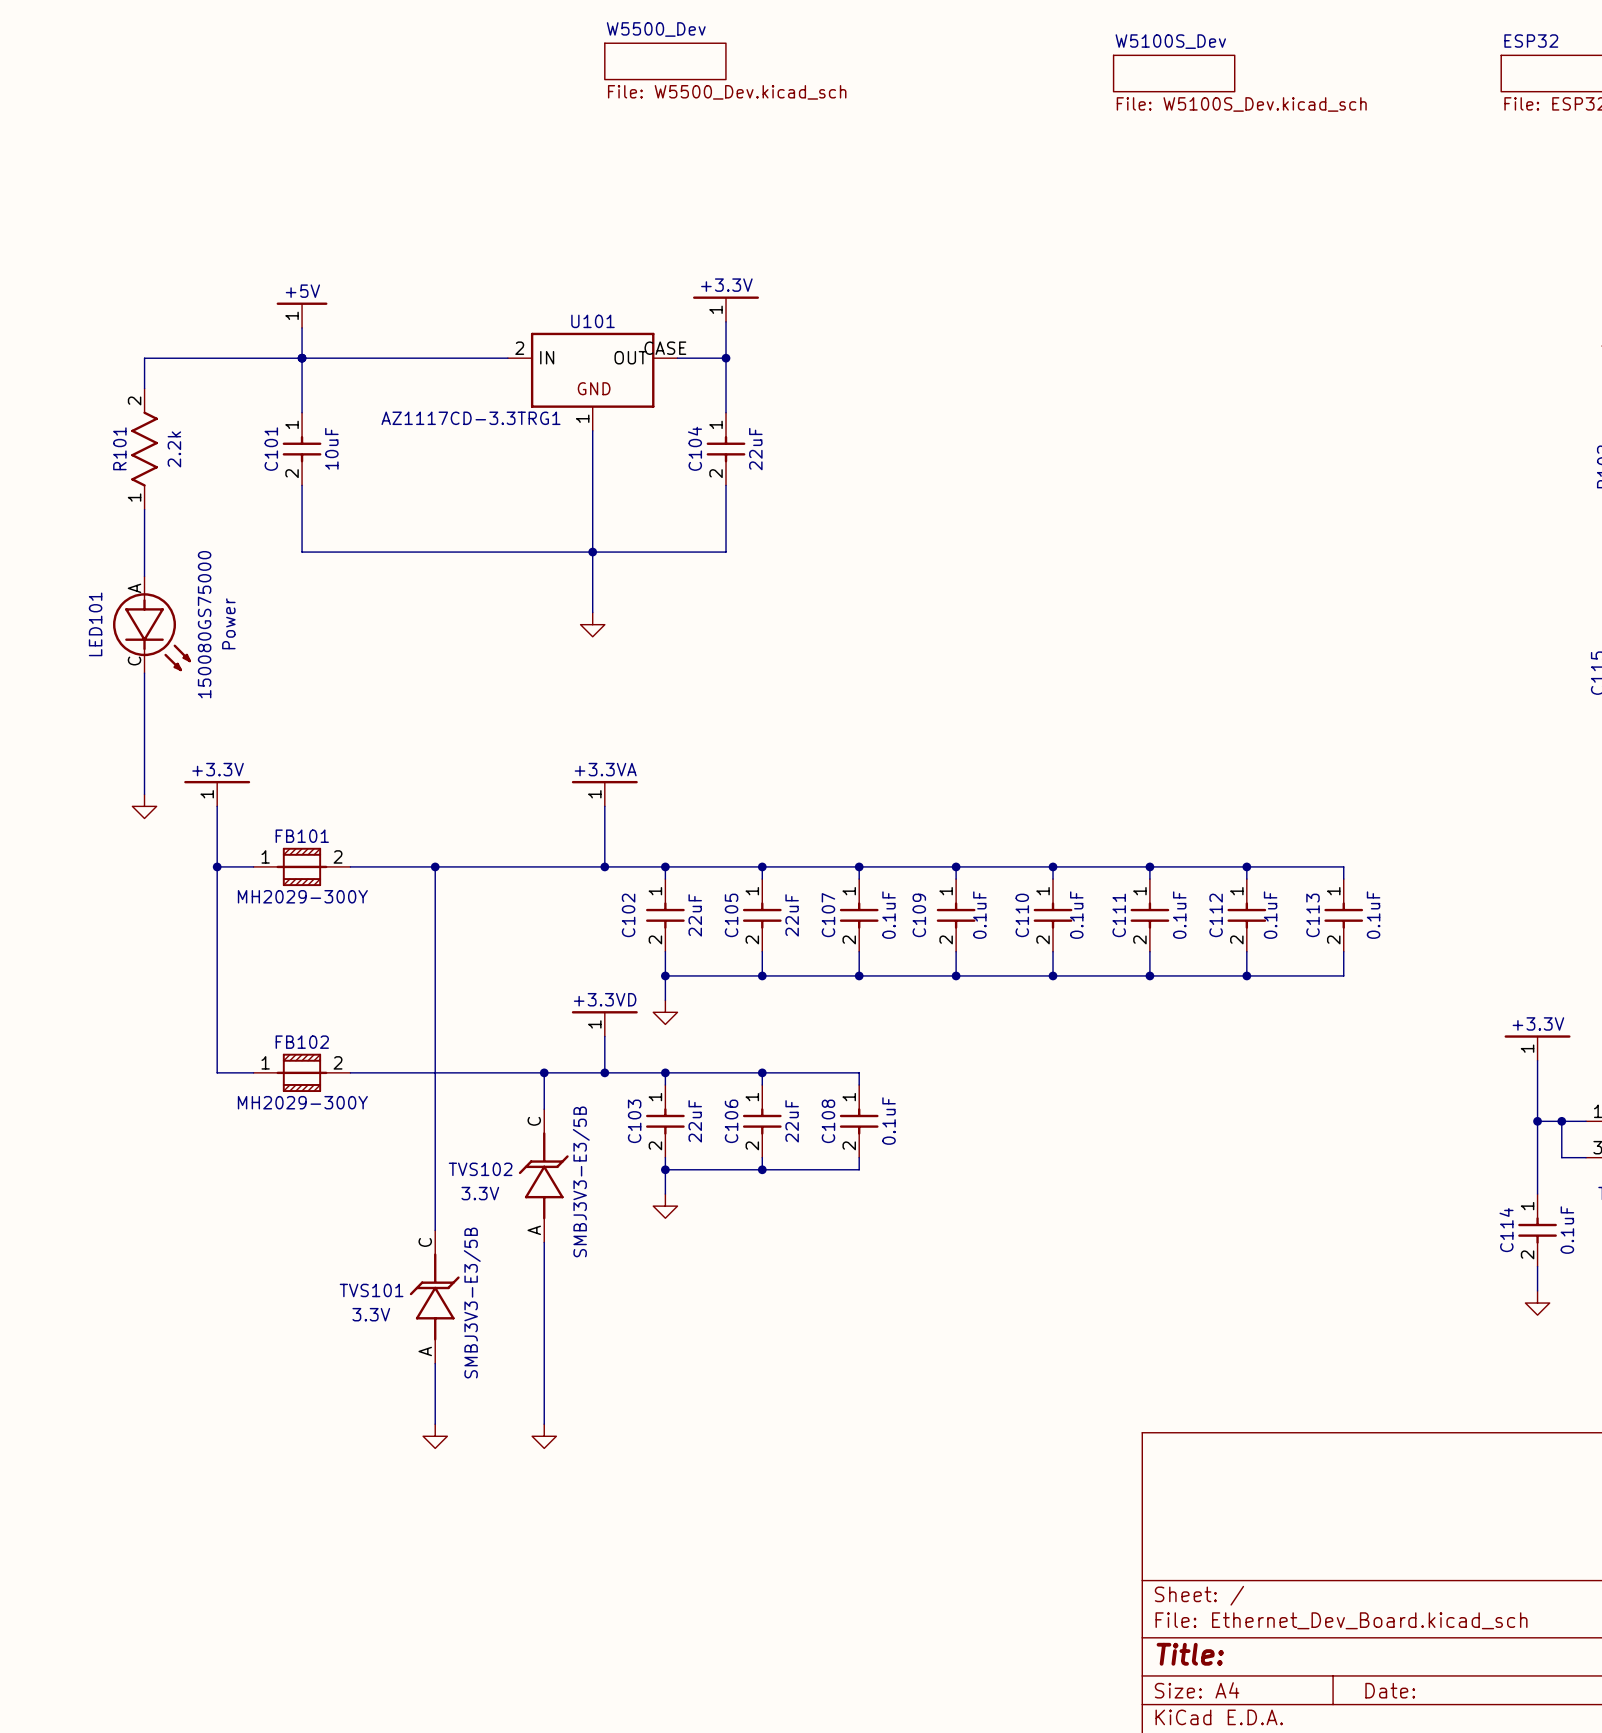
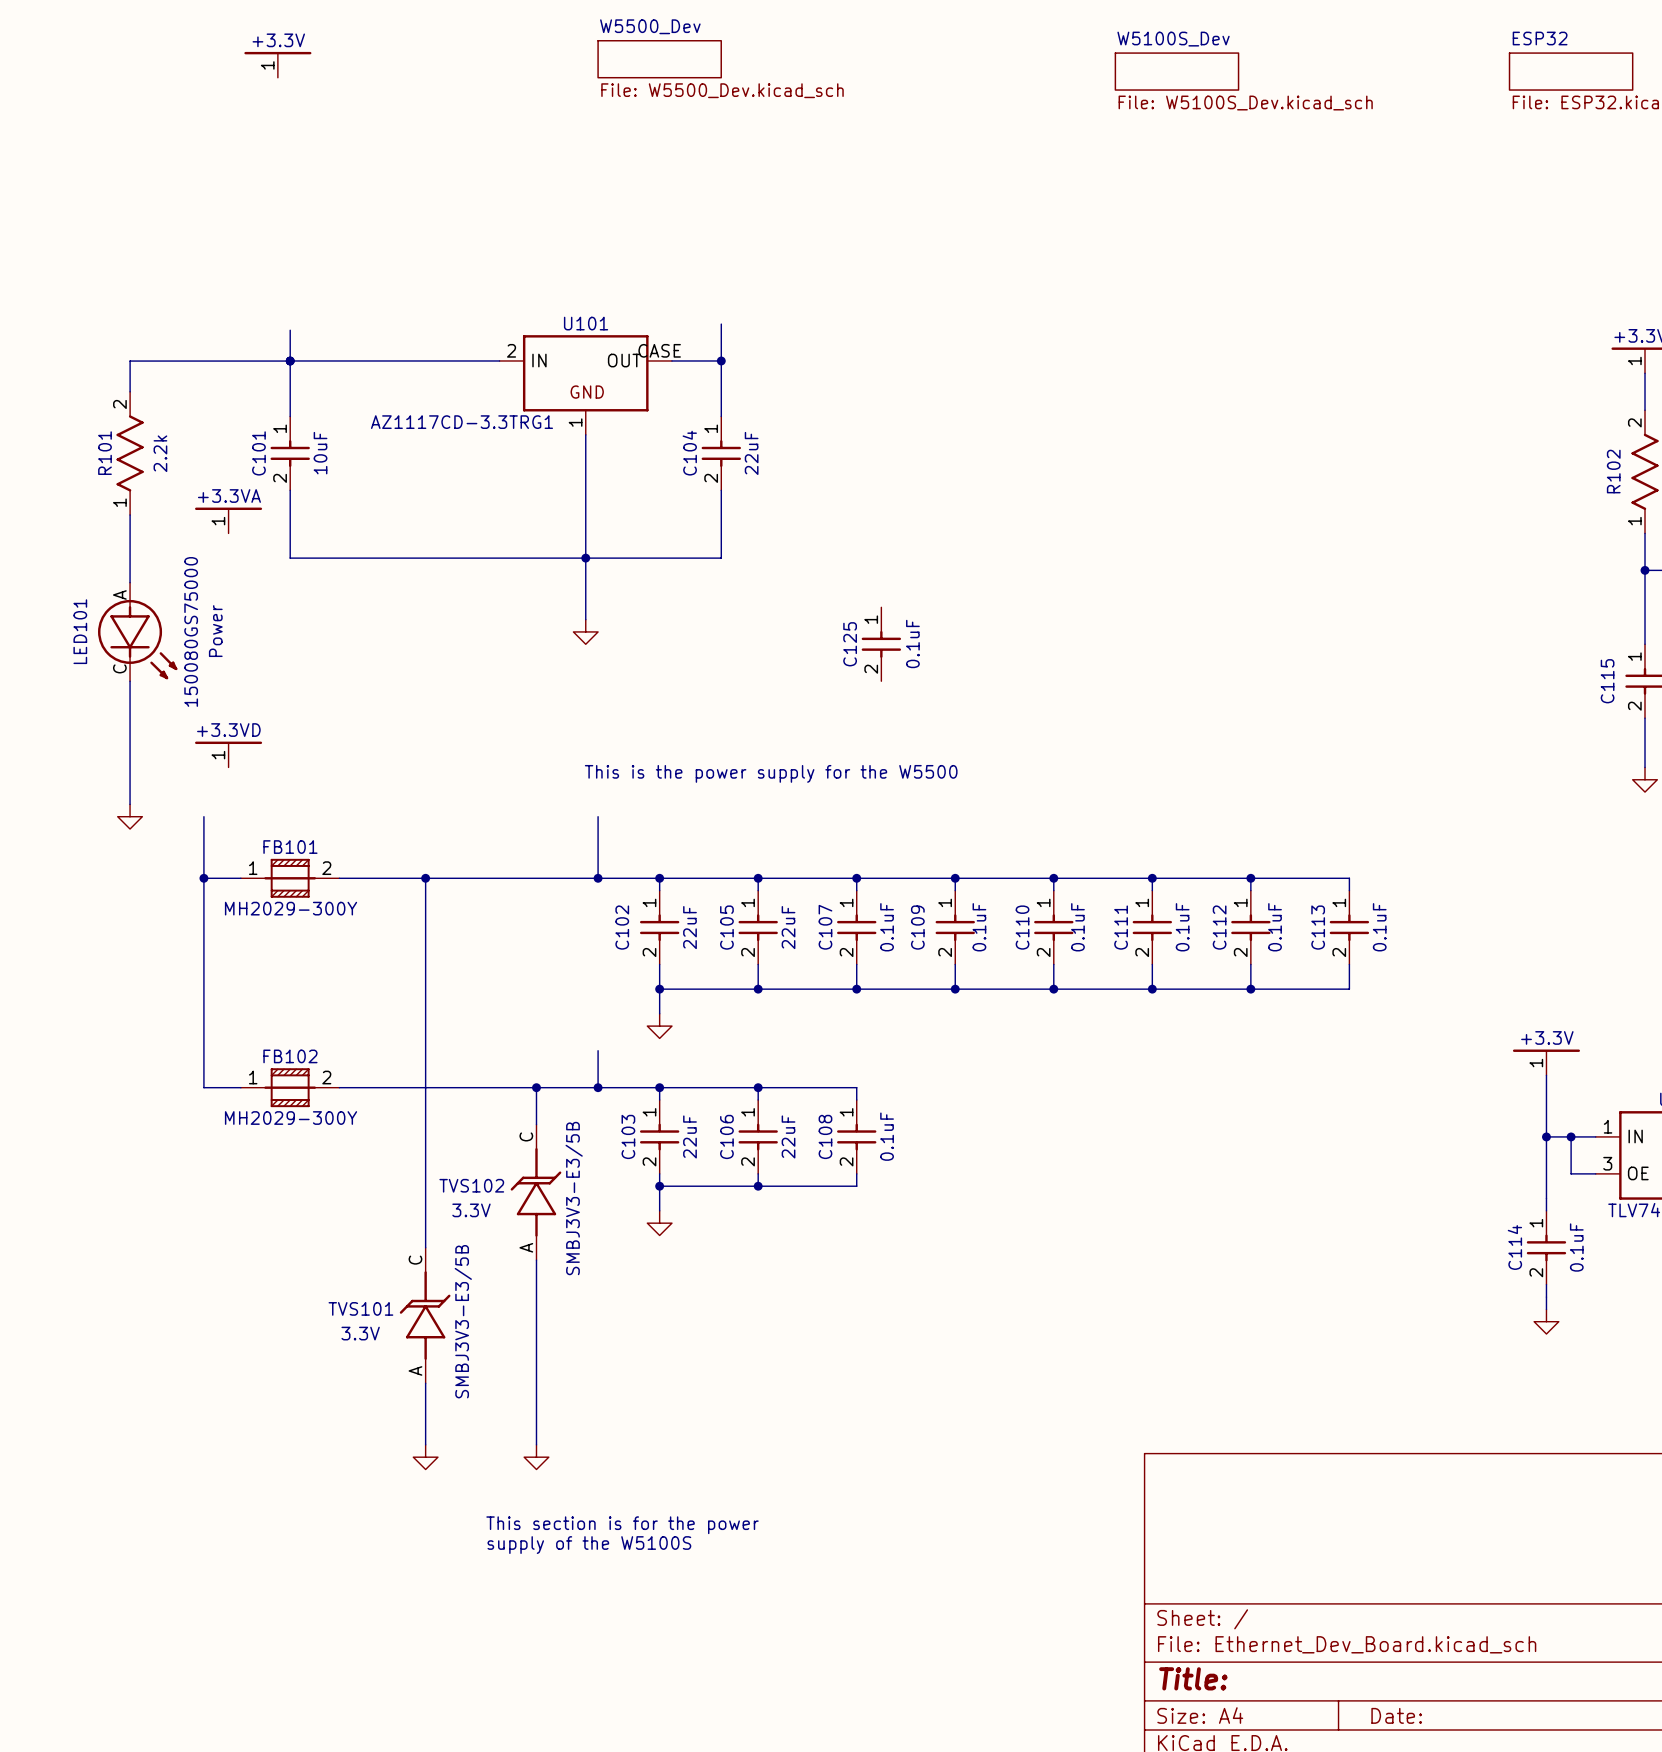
power symbol: none -> +3.3V (277, 64)
power symbol: +3.3V (726, 309) -> none
power symbol: +5V (302, 315) -> none
power symbol: none -> +3.3VA (228, 520)
C125: none -> 0.1uF (881, 644)
power symbol: none -> +3.3VD (228, 754)
text: none -> This is the power supply for the W5500 (771, 773)
power symbol: +3.3V (217, 793) -> none
power symbol: +3.3VA (604, 793) -> none
power symbol: +3.3VD (604, 1023) -> none
text: none -> This section is for the power (622, 1525)
text: none -> supply of the W5100S (589, 1545)

